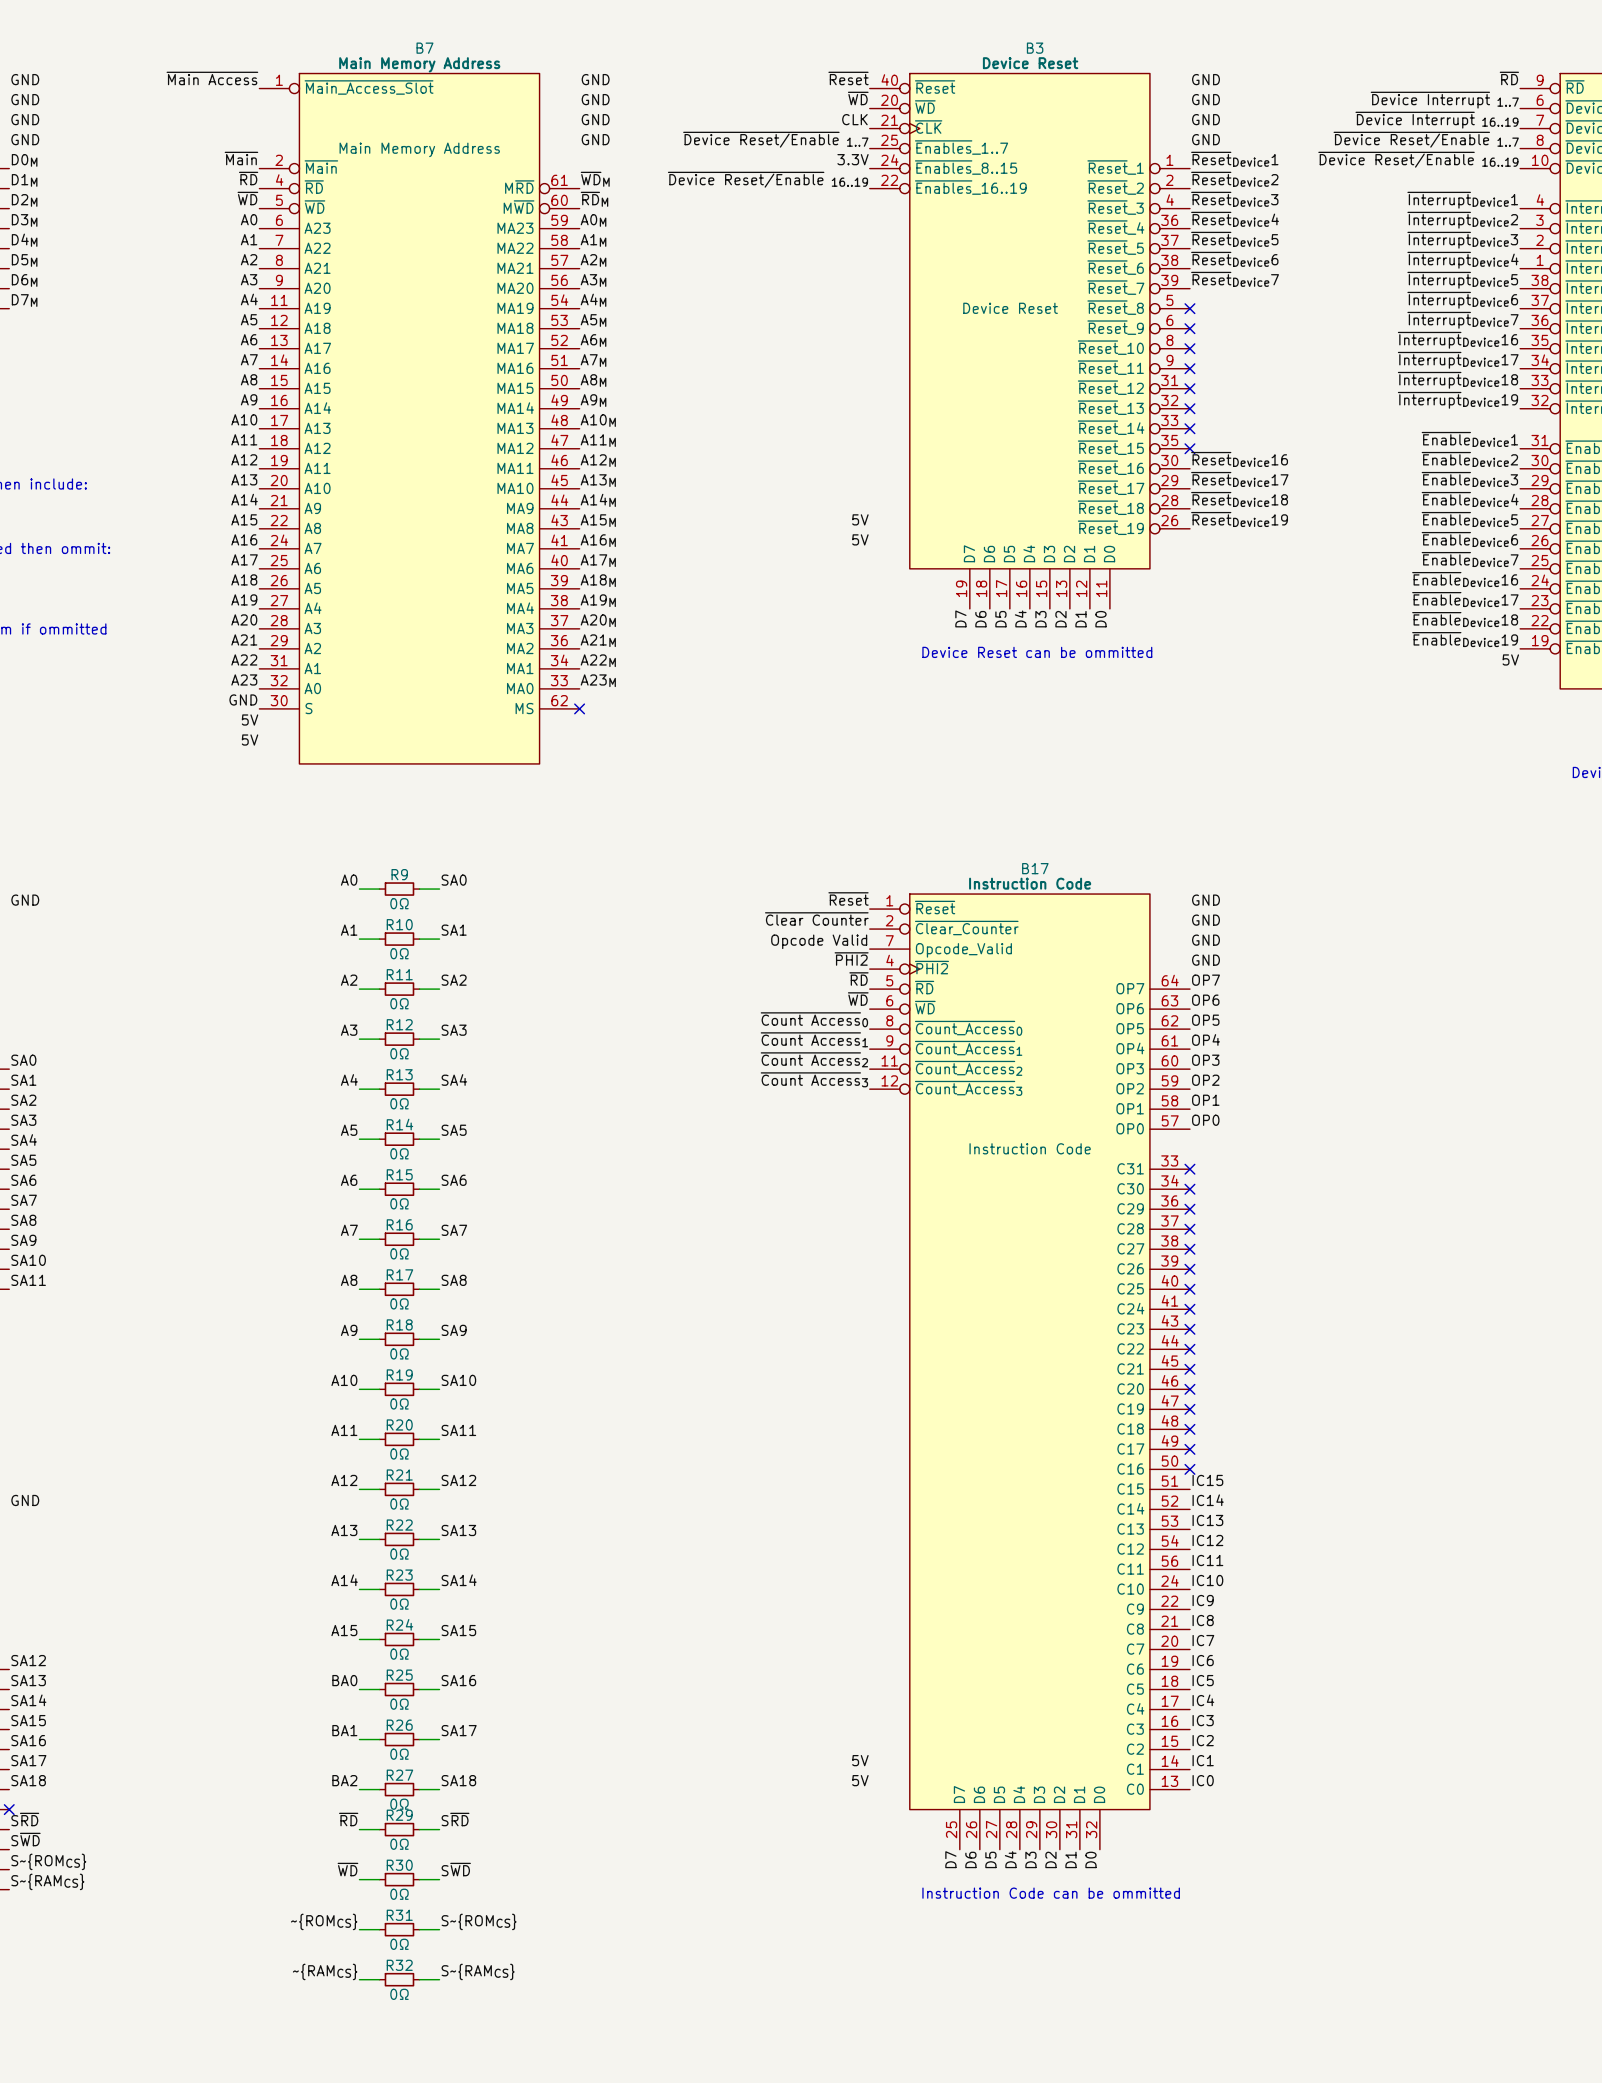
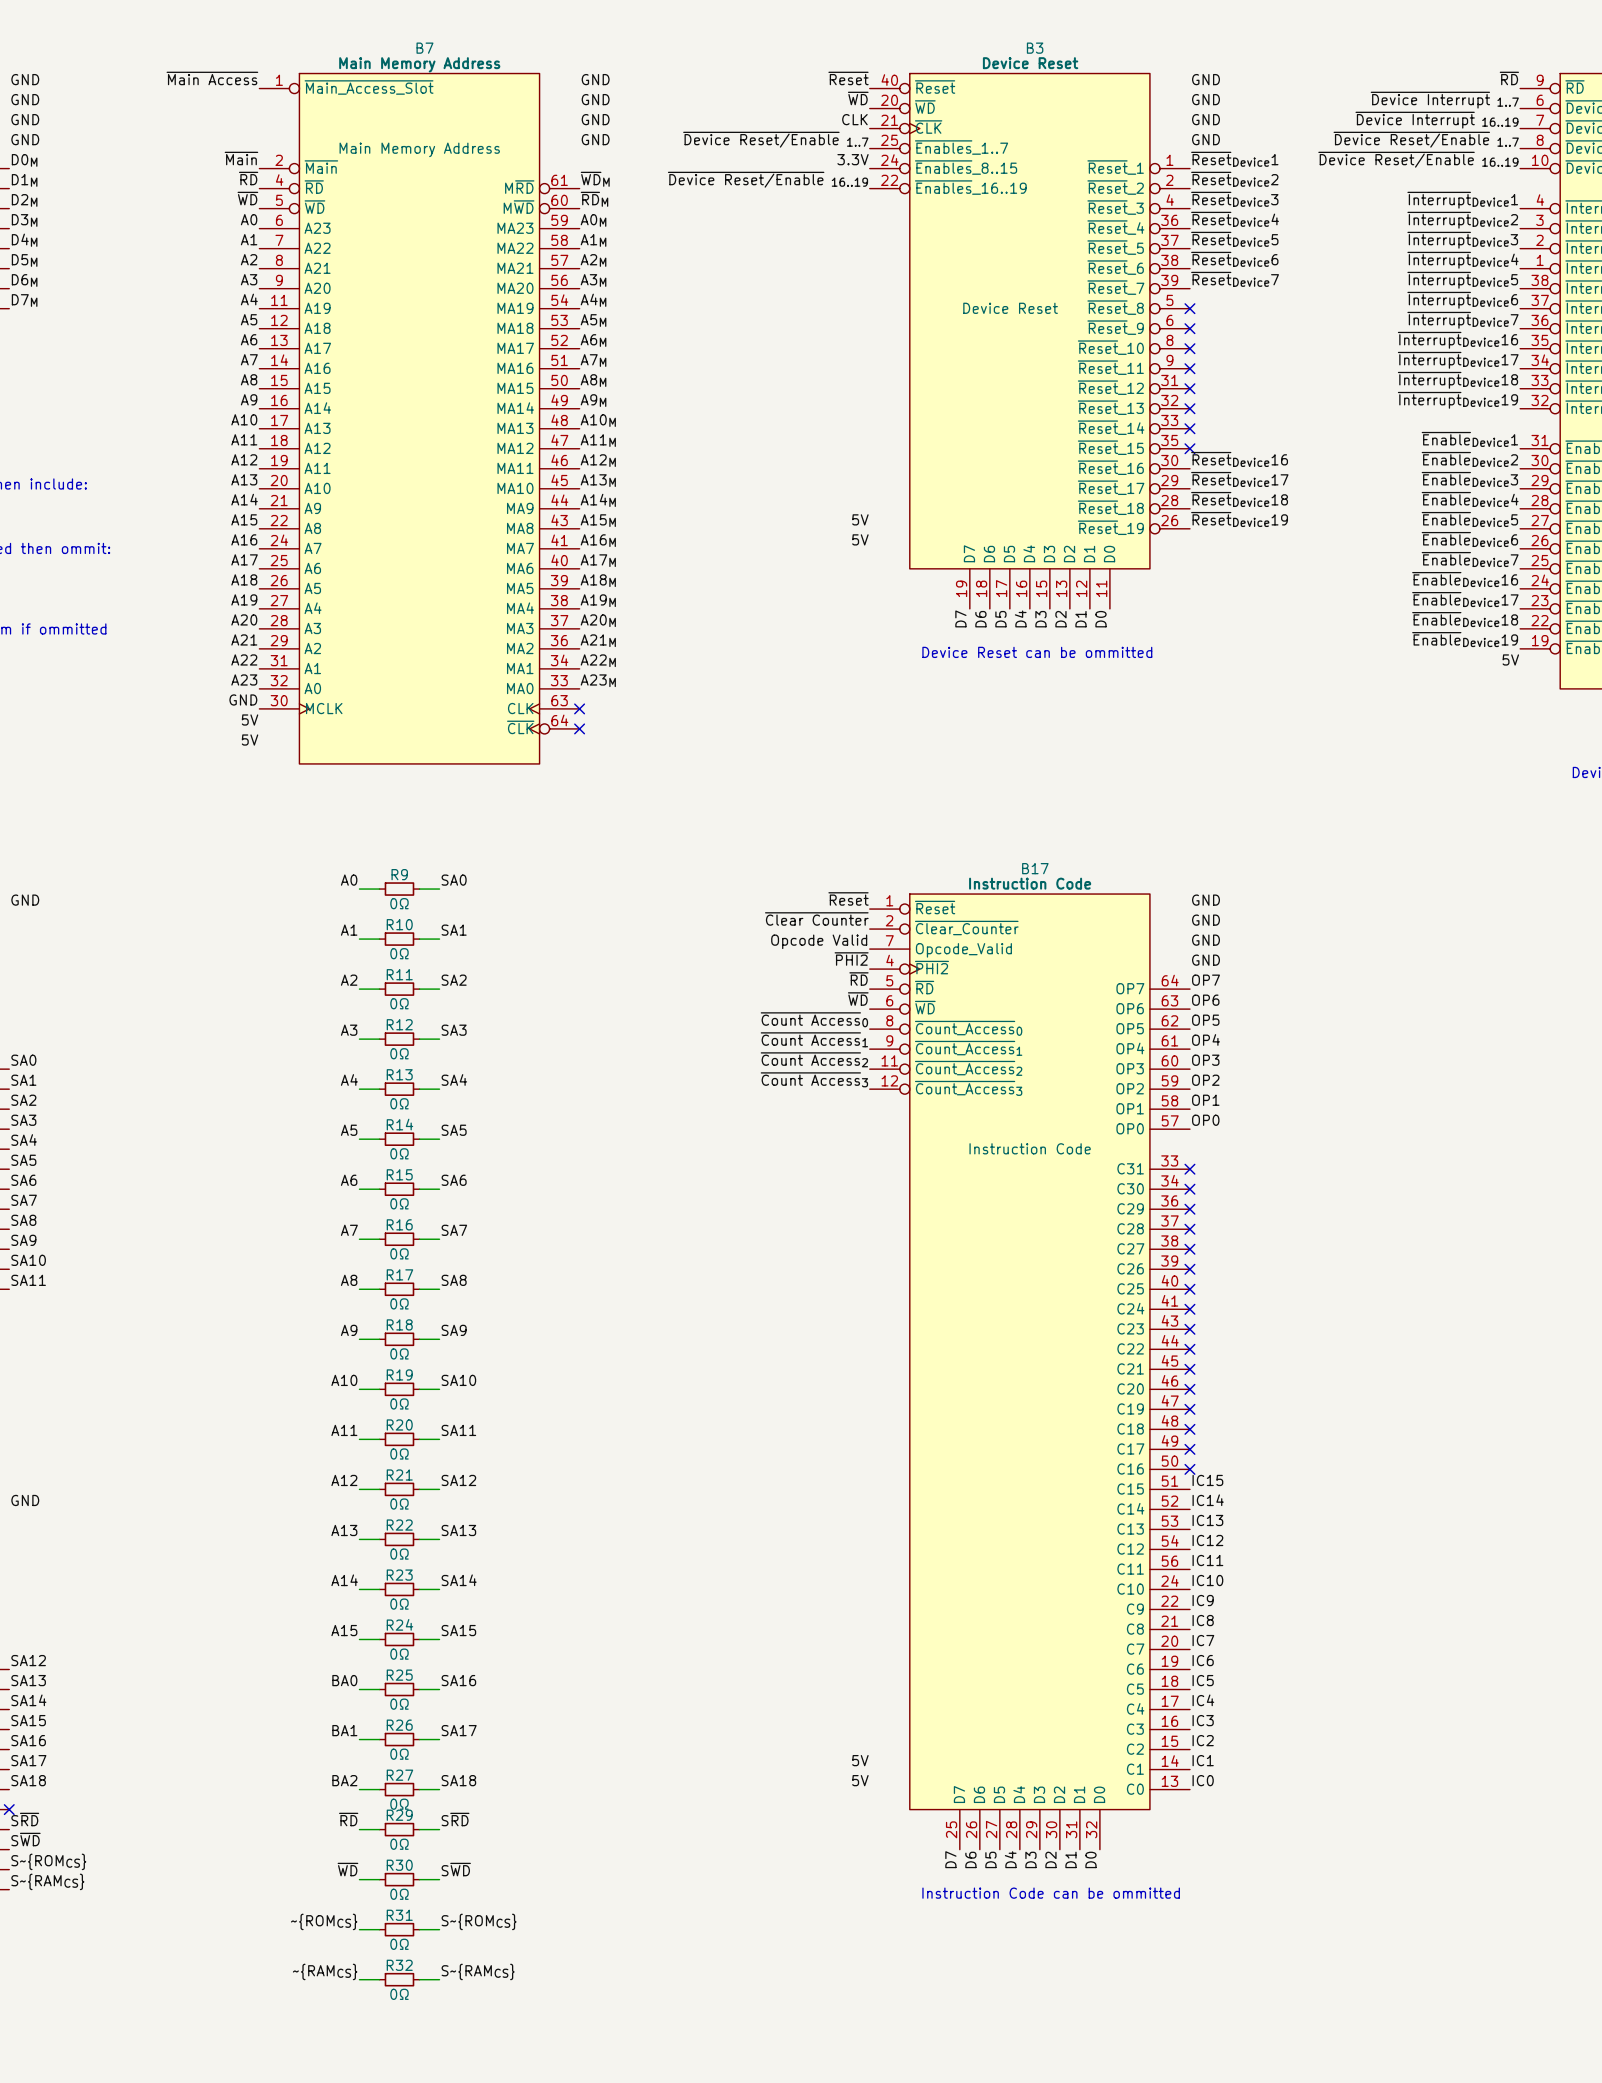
B7 symbol: [259, 72, 580, 765] -> [259, 72, 580, 765]
no-connect mark: none -> (579, 728)

